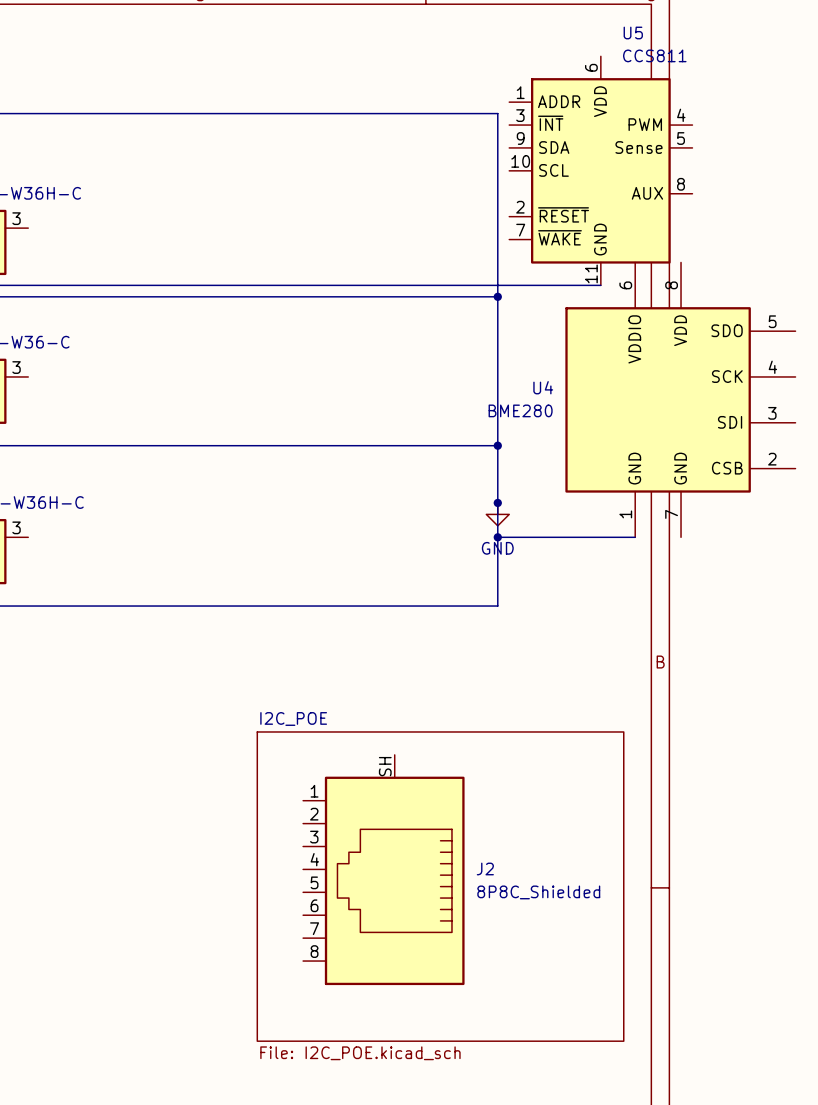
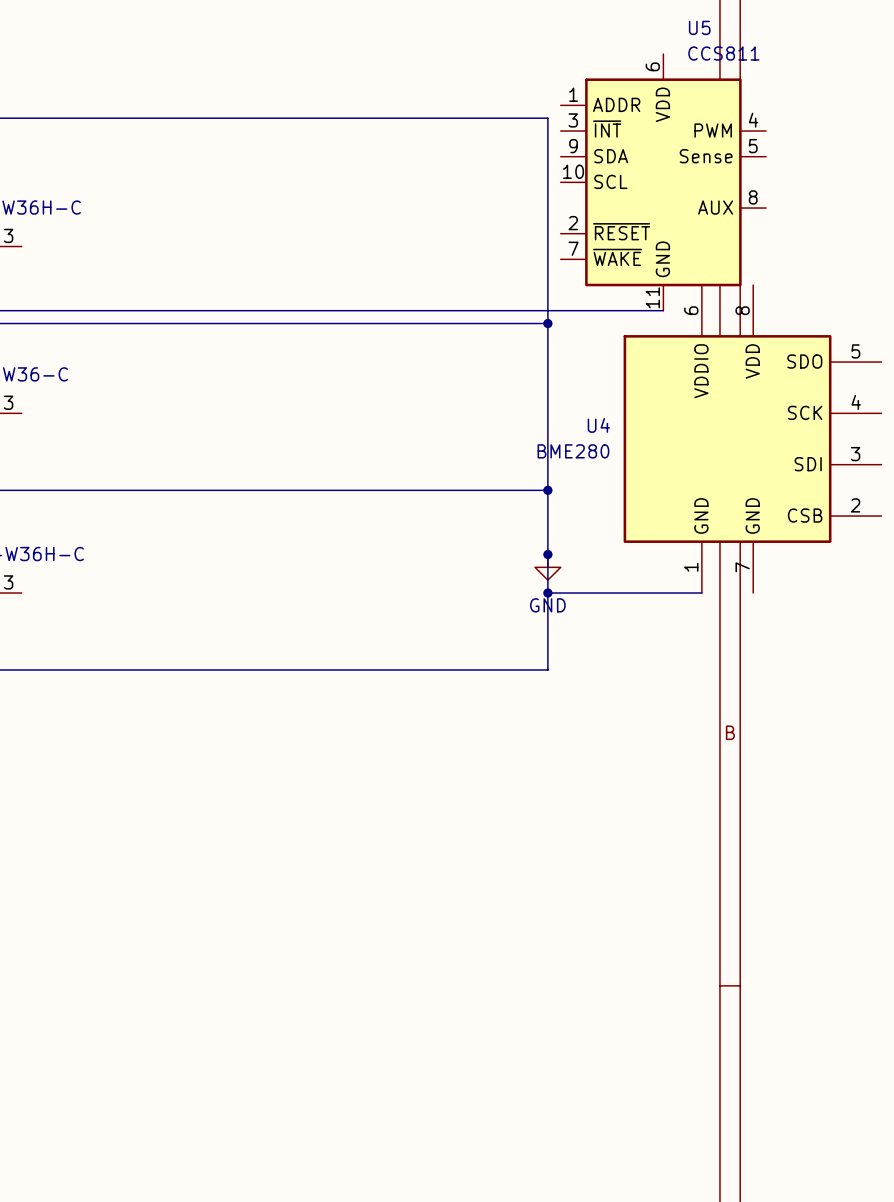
J2: 8P8C_Shielded (383, 869) -> none
sheet I2C_POE: File: I2C_POE.kicad_sch (440, 886) -> none

